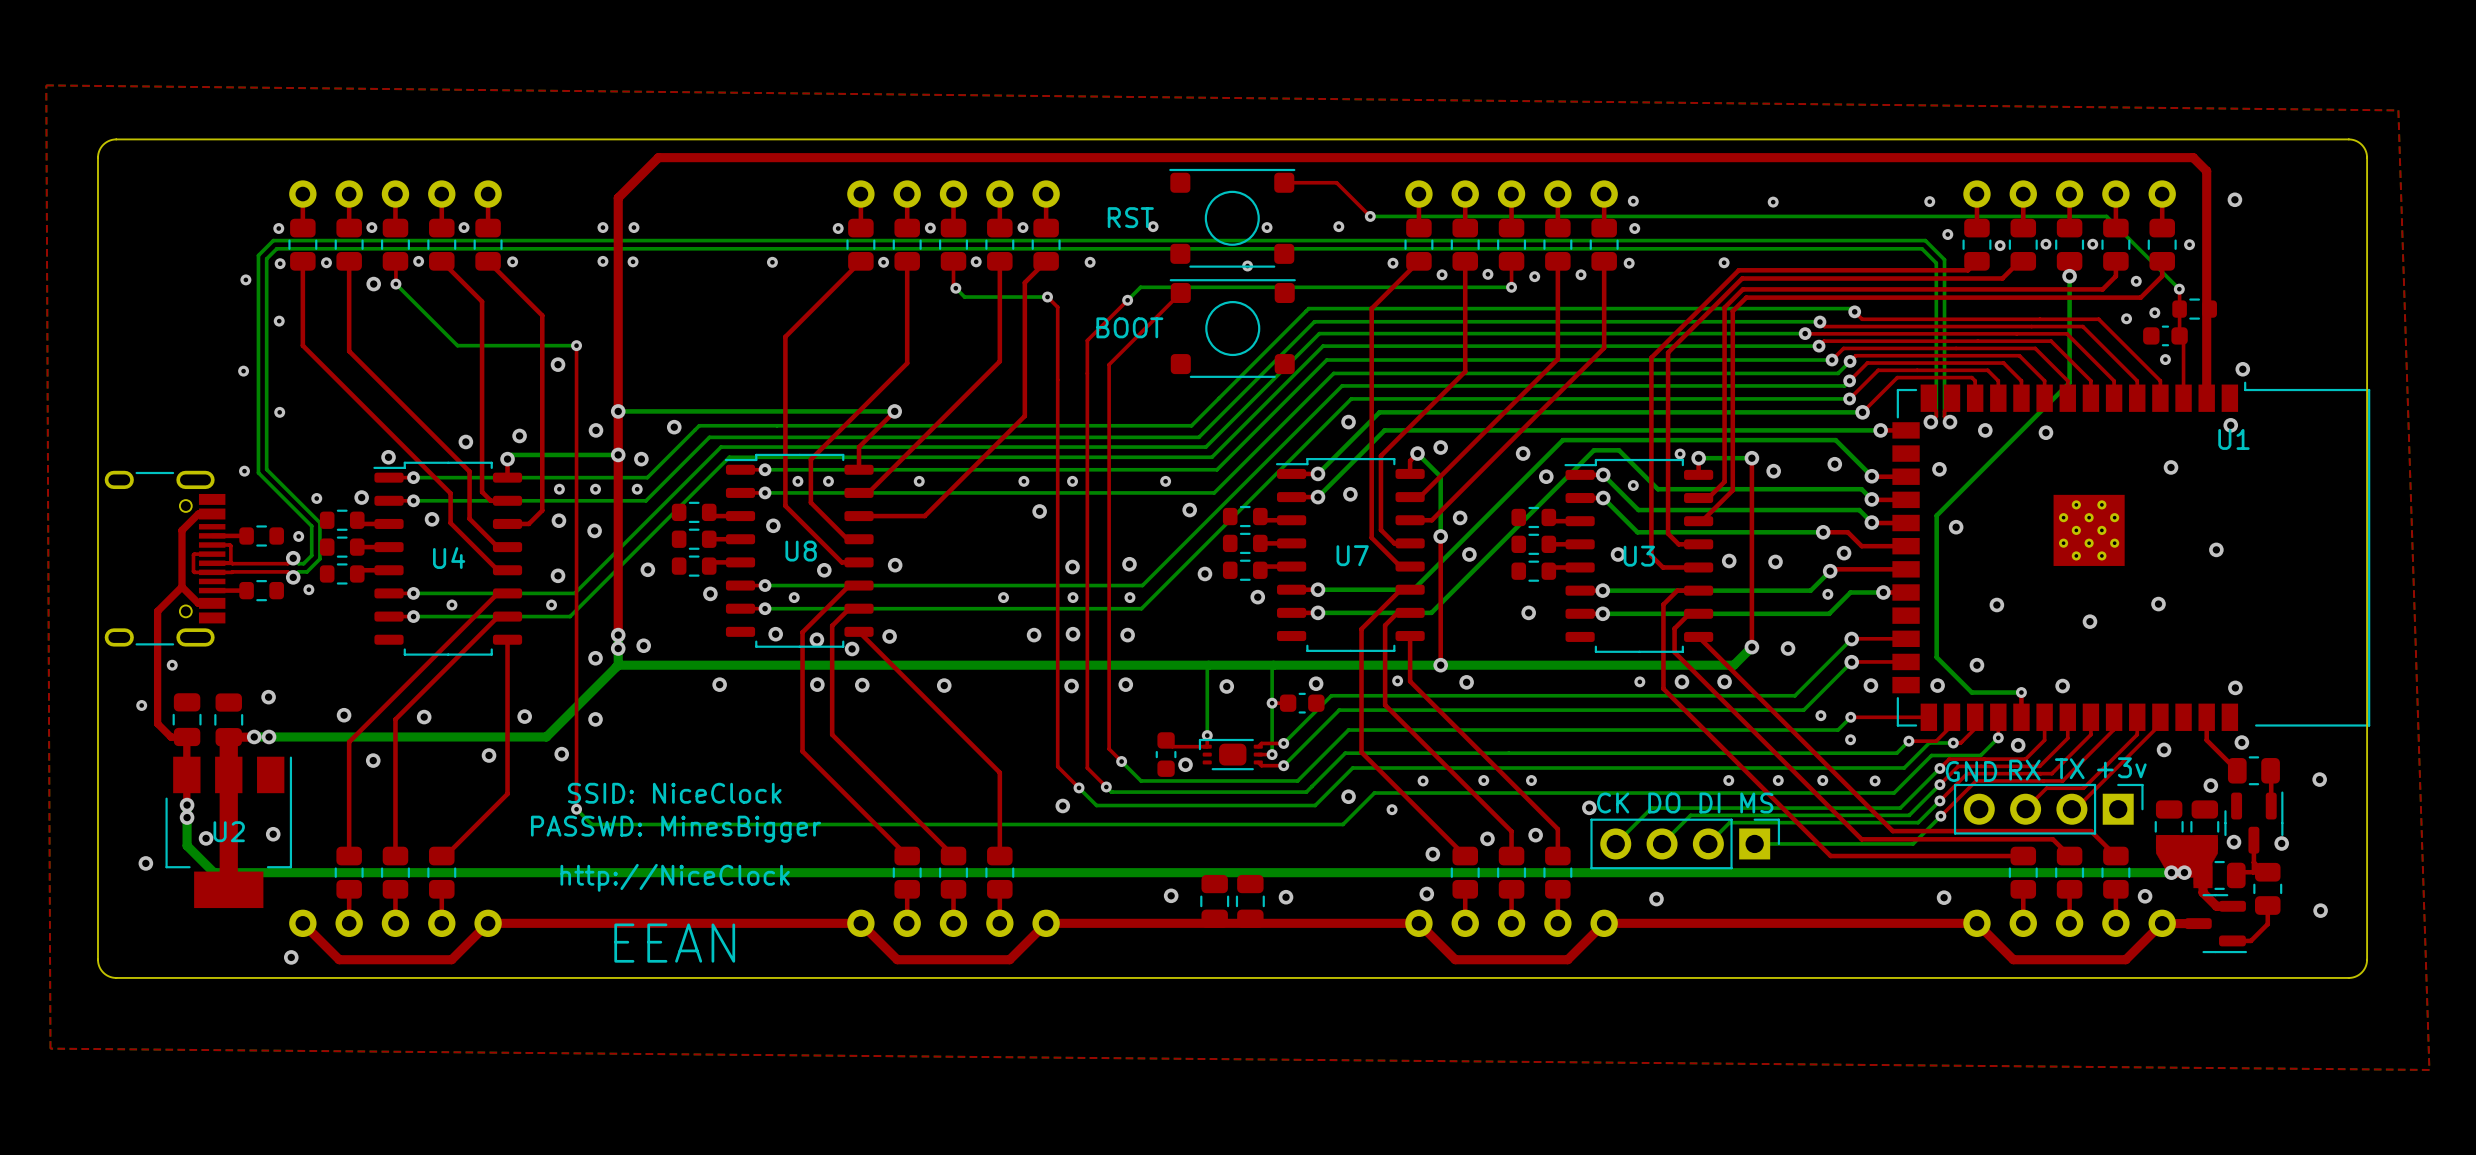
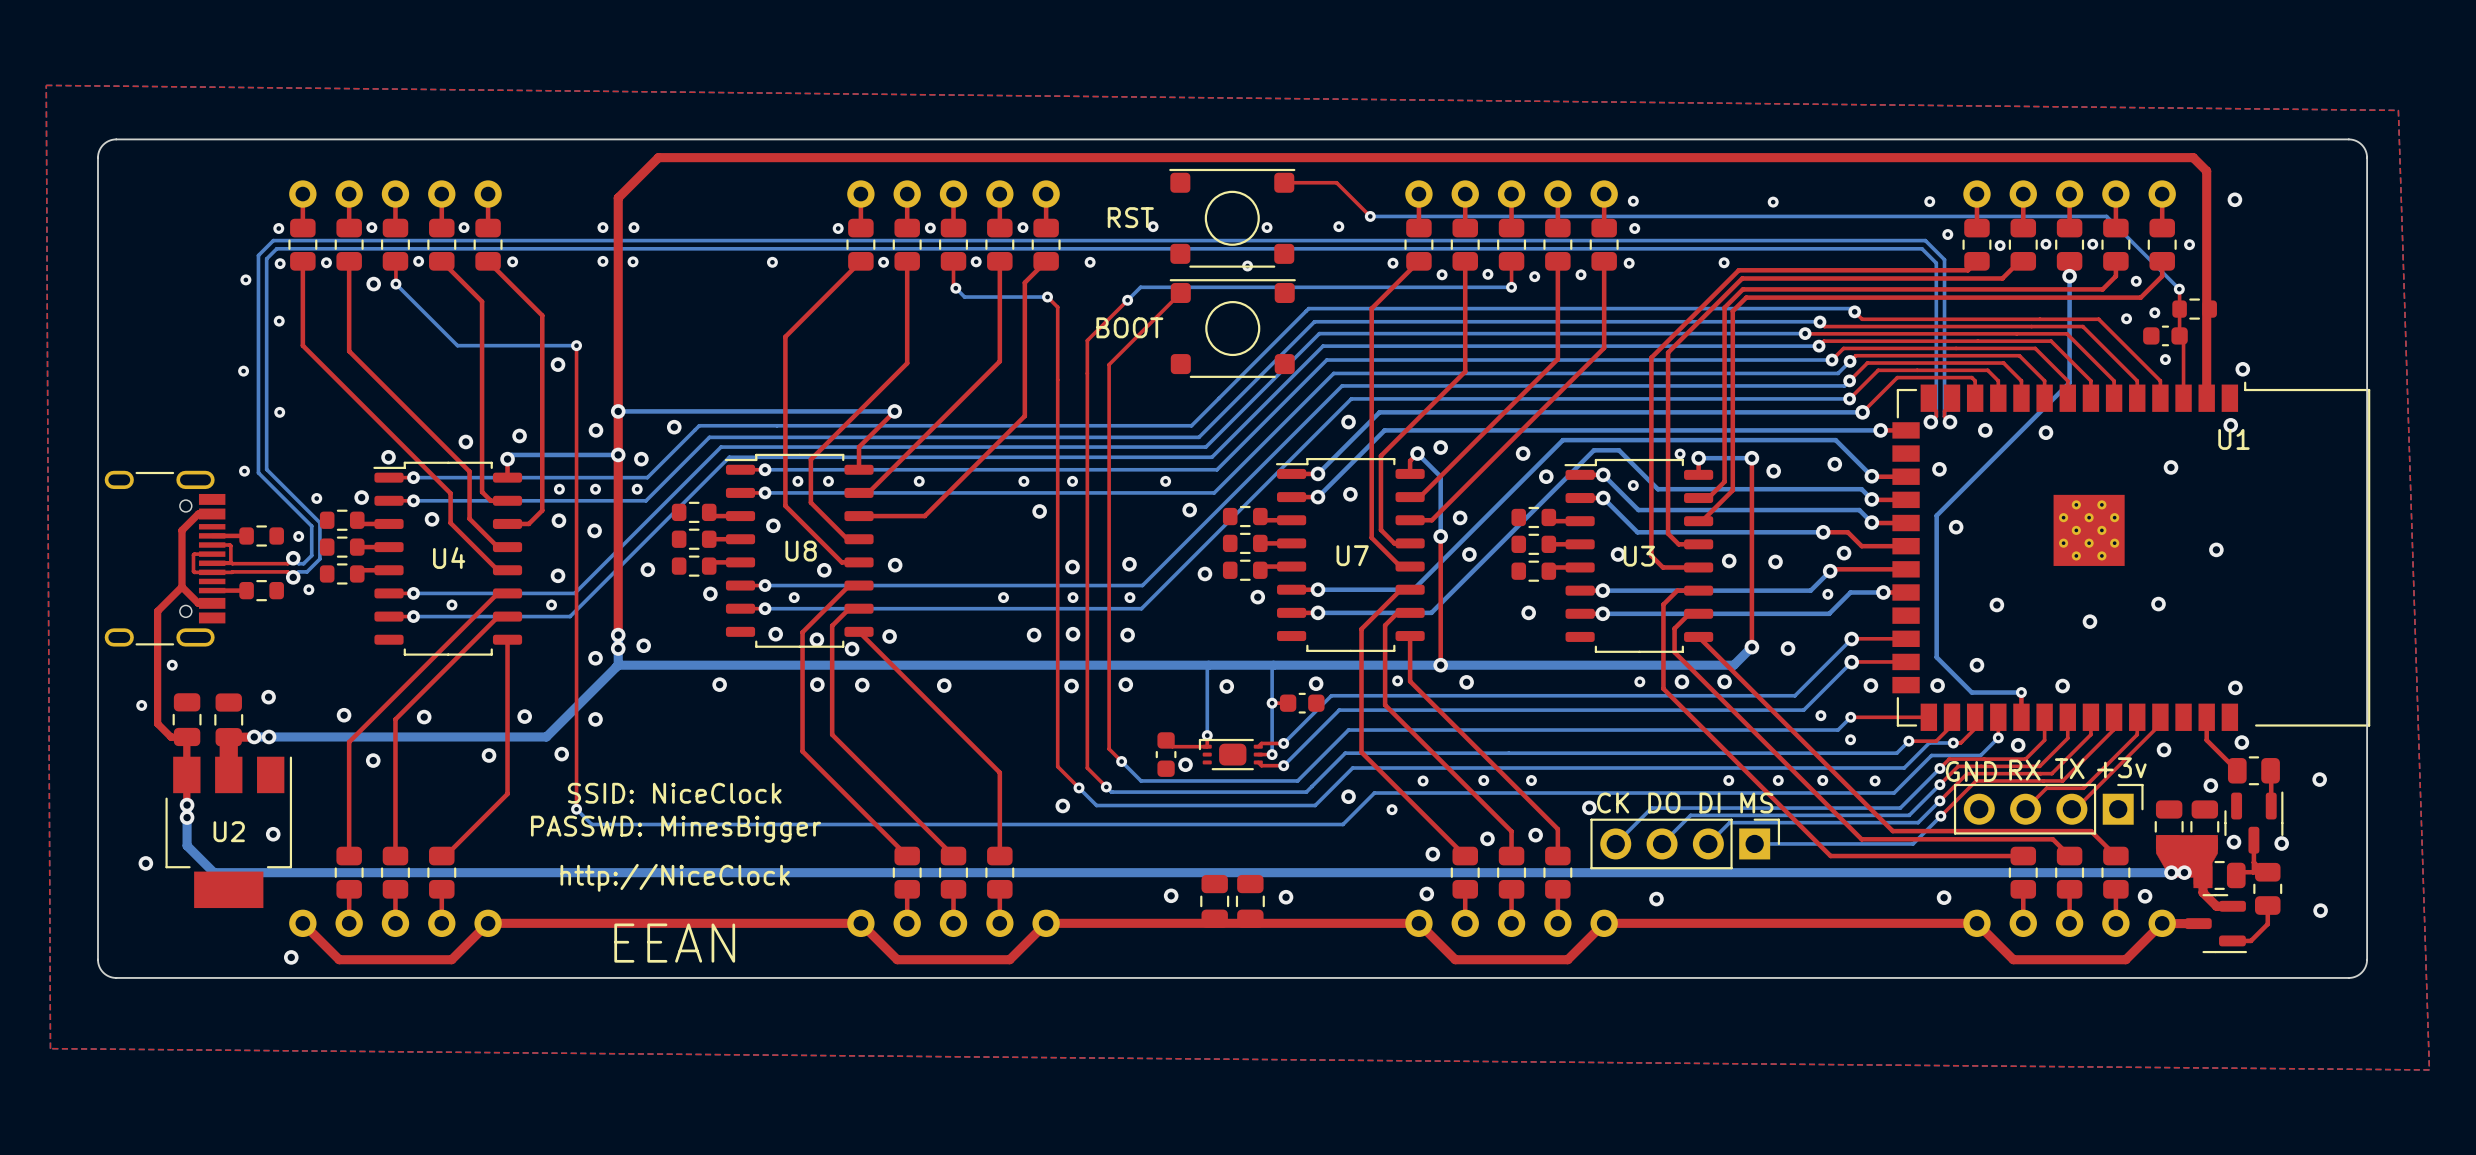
top track: (228, 774) (228, 889) -> none
via: (206, 838) -> none

